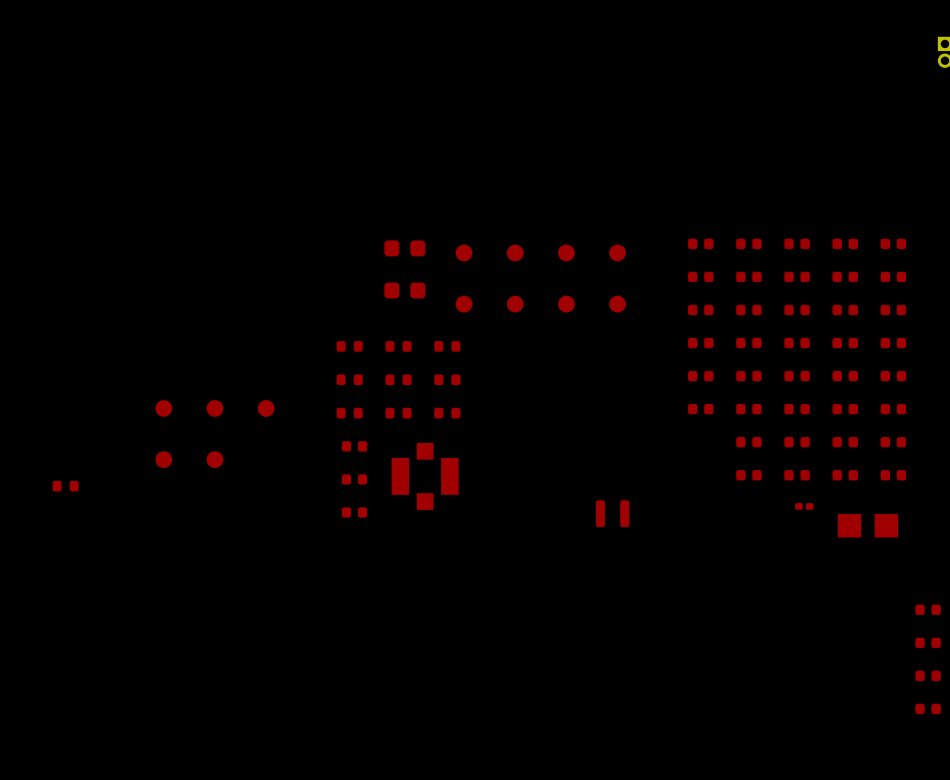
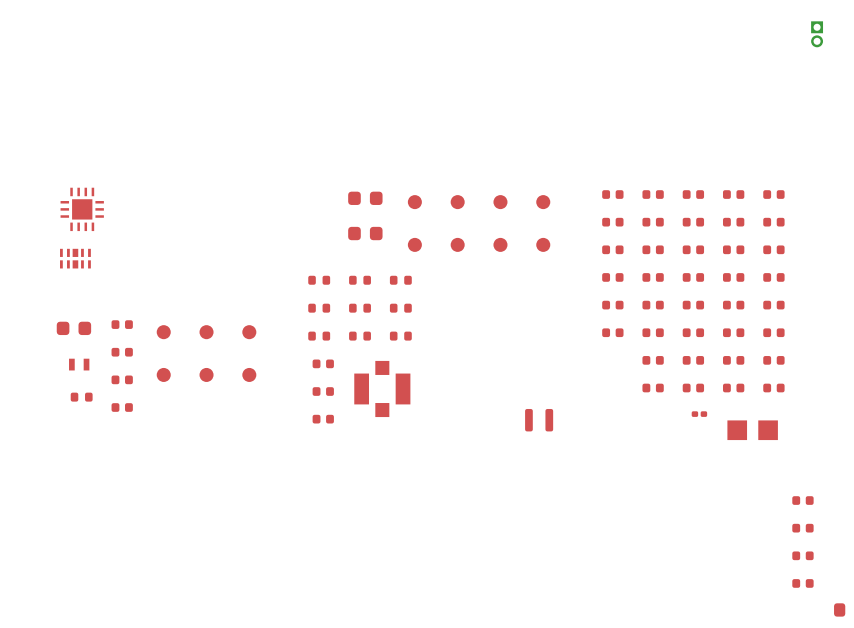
part: none -> (82, 209)
part: none -> (75, 258)
part: none -> (122, 324)
part: none -> (73, 328)
part: none -> (122, 352)
part: none -> (79, 364)
part: none -> (249, 374)
part: none -> (122, 379)
part: none -> (122, 407)

